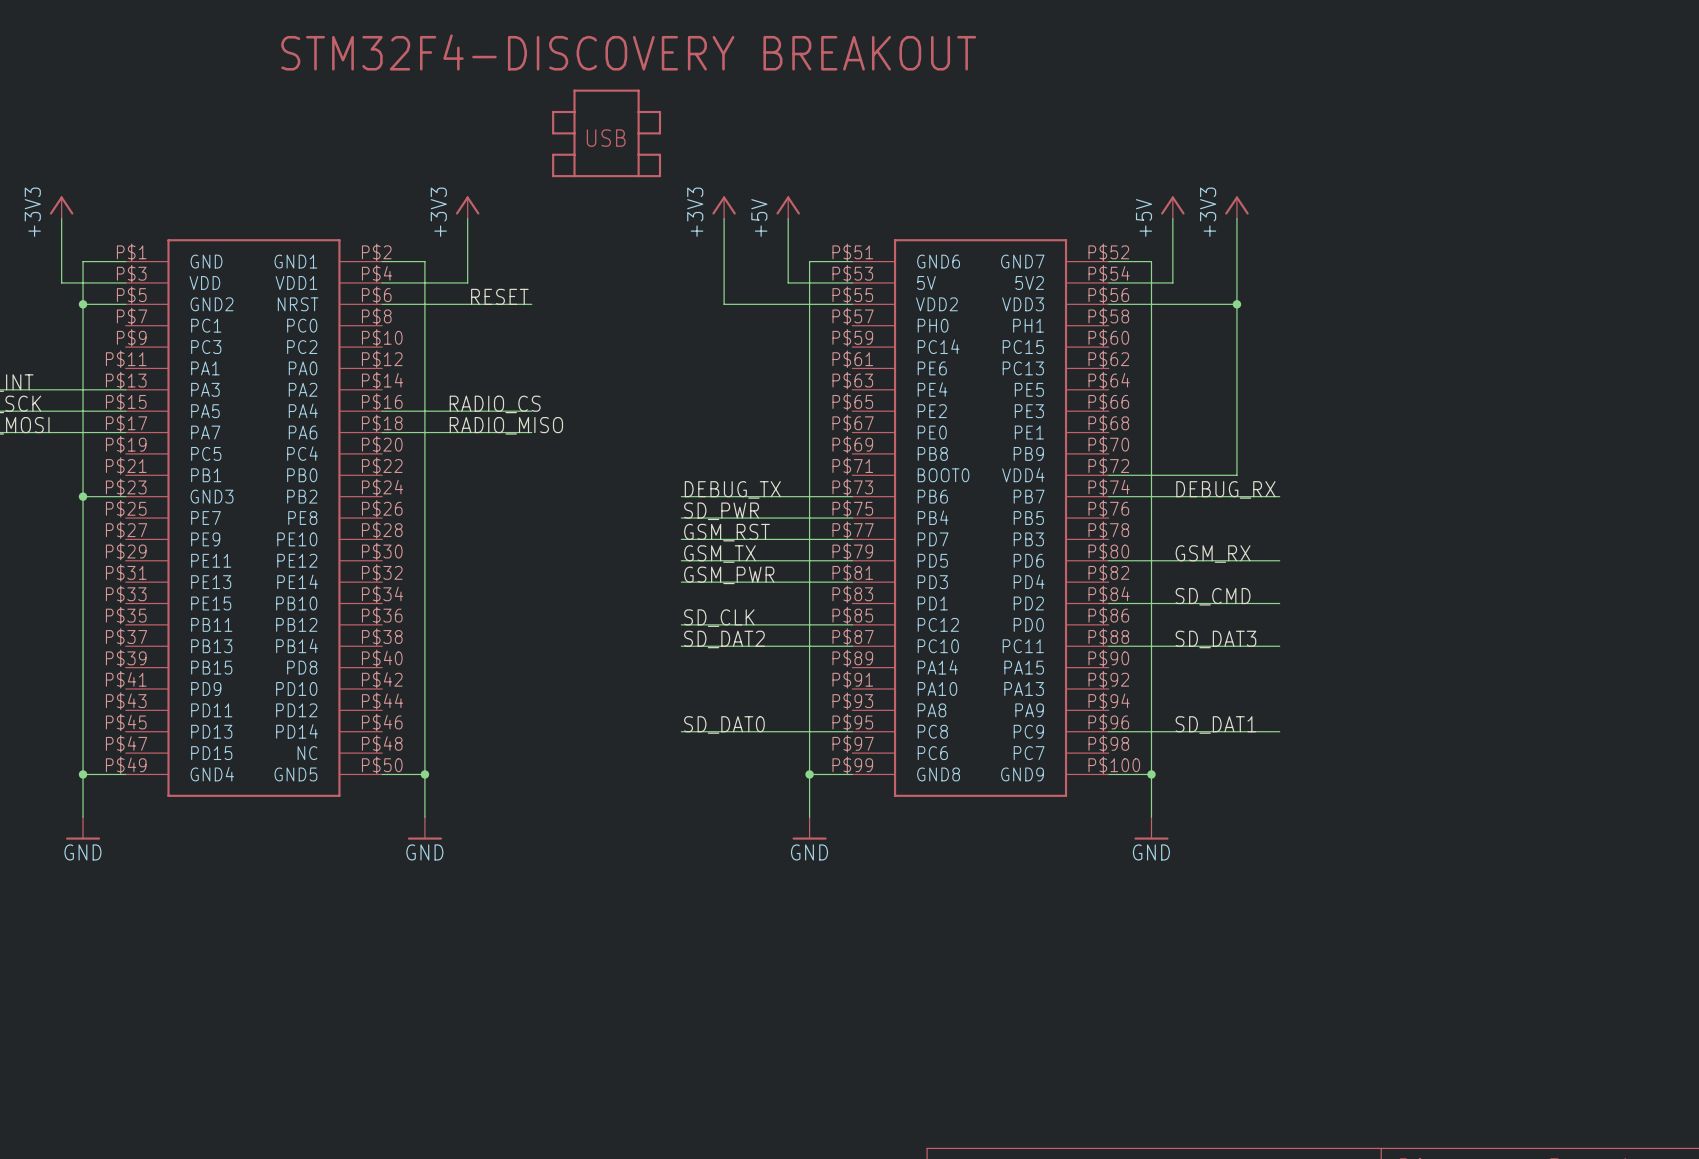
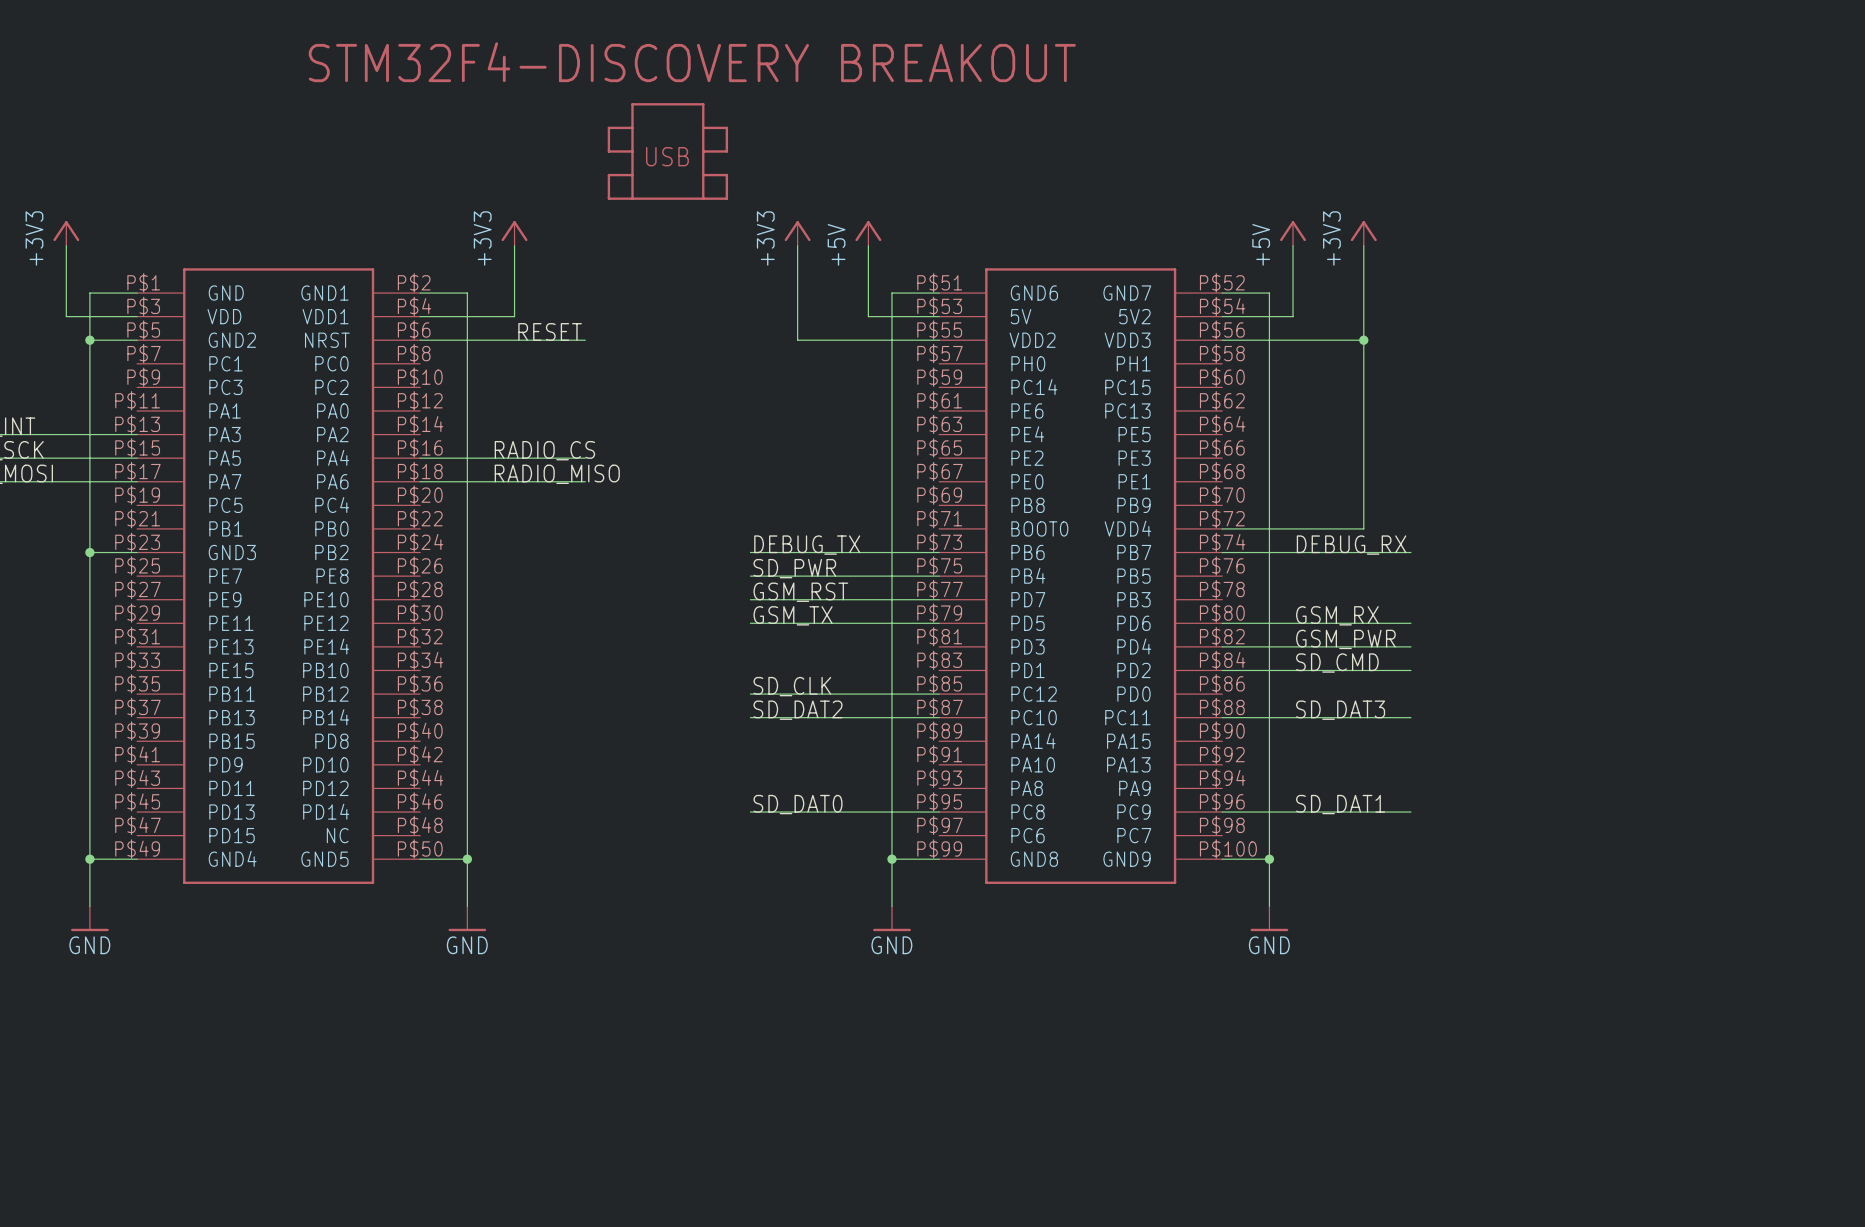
label: GSM_PWR (729, 575) -> none
label: none -> GSM_PWR (1345, 639)
wire: (681, 582) (852, 582) -> none
wire: none -> (1222, 646) (1410, 646)

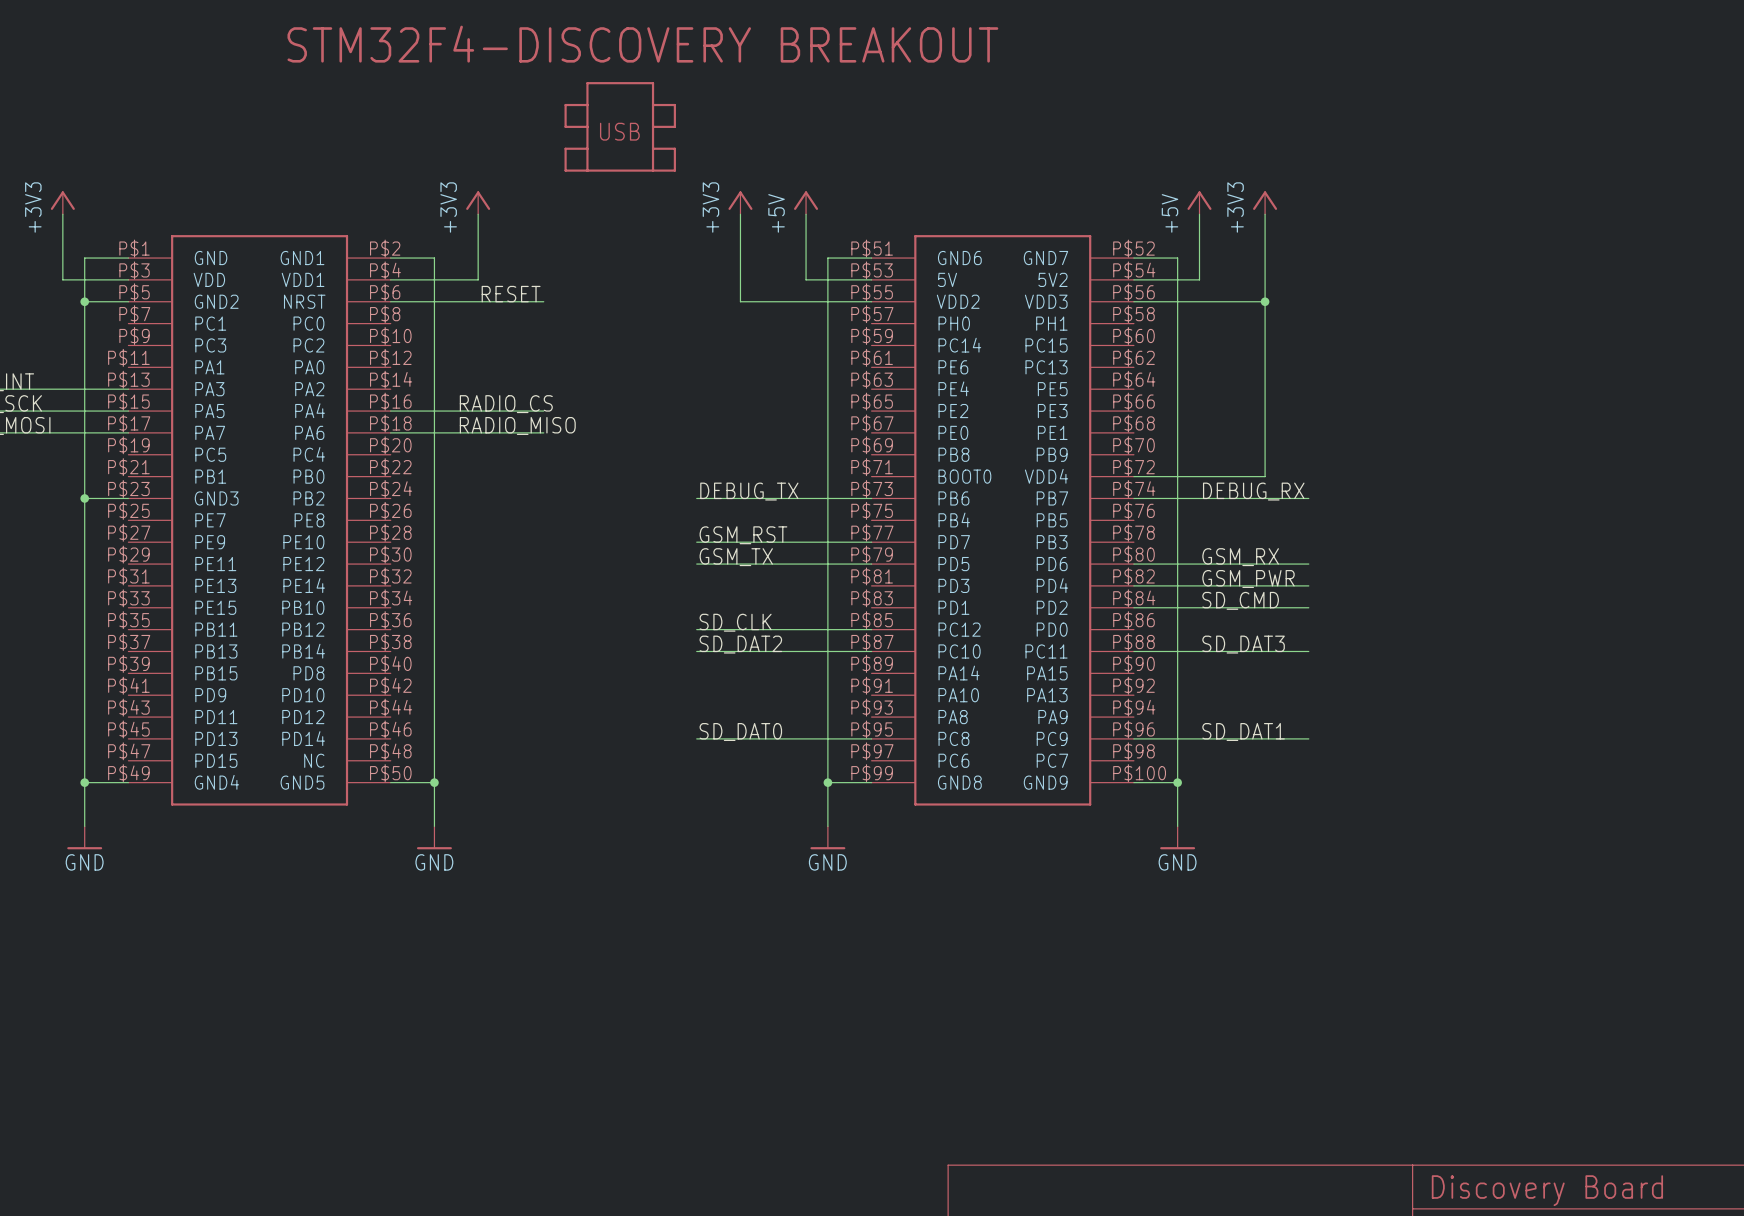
label: SD_PWR (794, 568) -> none
wire: (750, 576) (939, 576) -> none

